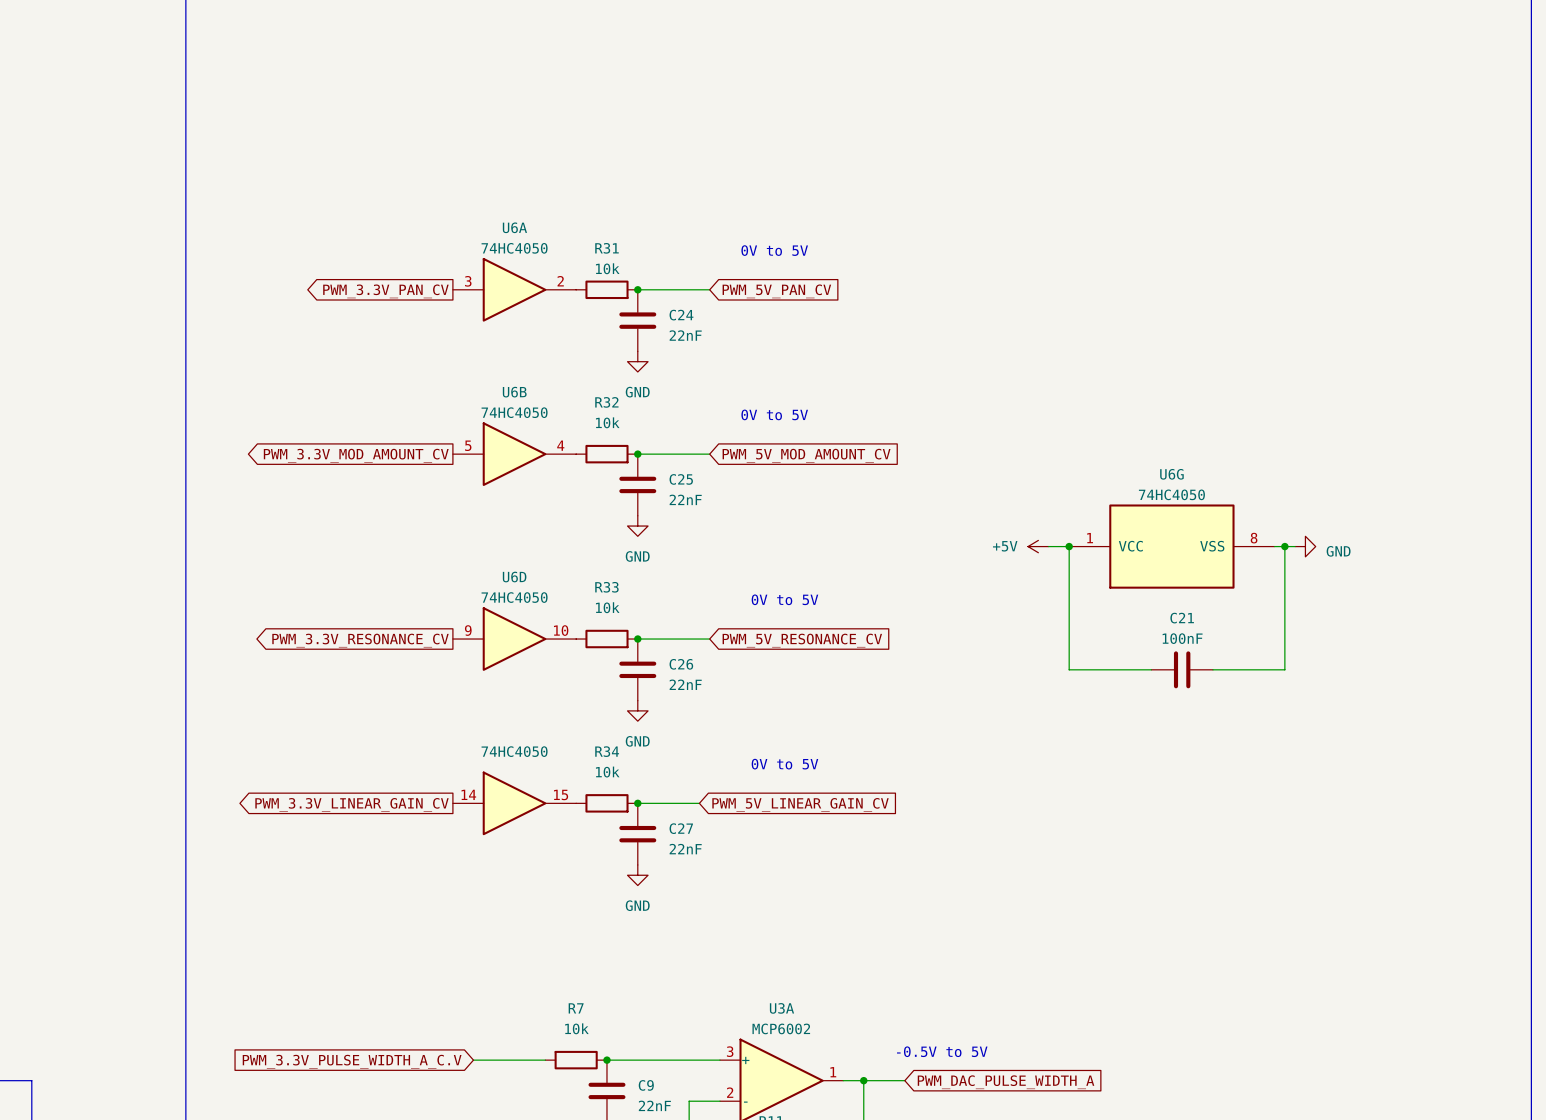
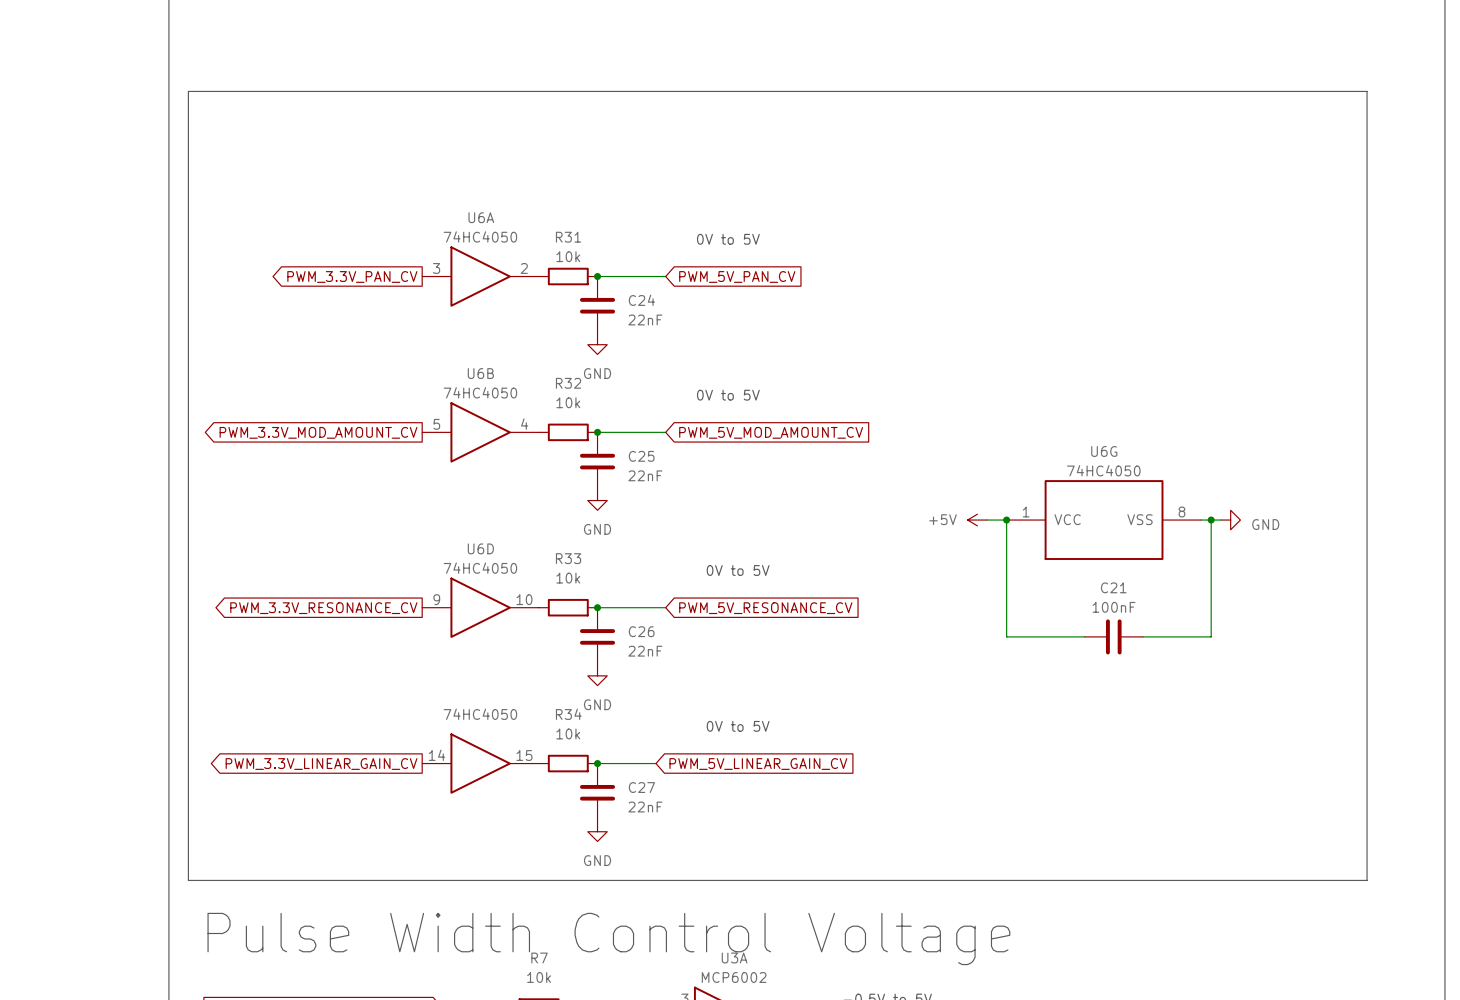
line: none -> (188, 91) (1367, 91) (1367, 880) (188, 880) (188, 91)
text: none -> Pulse Width Control Voltage (608, 938)

